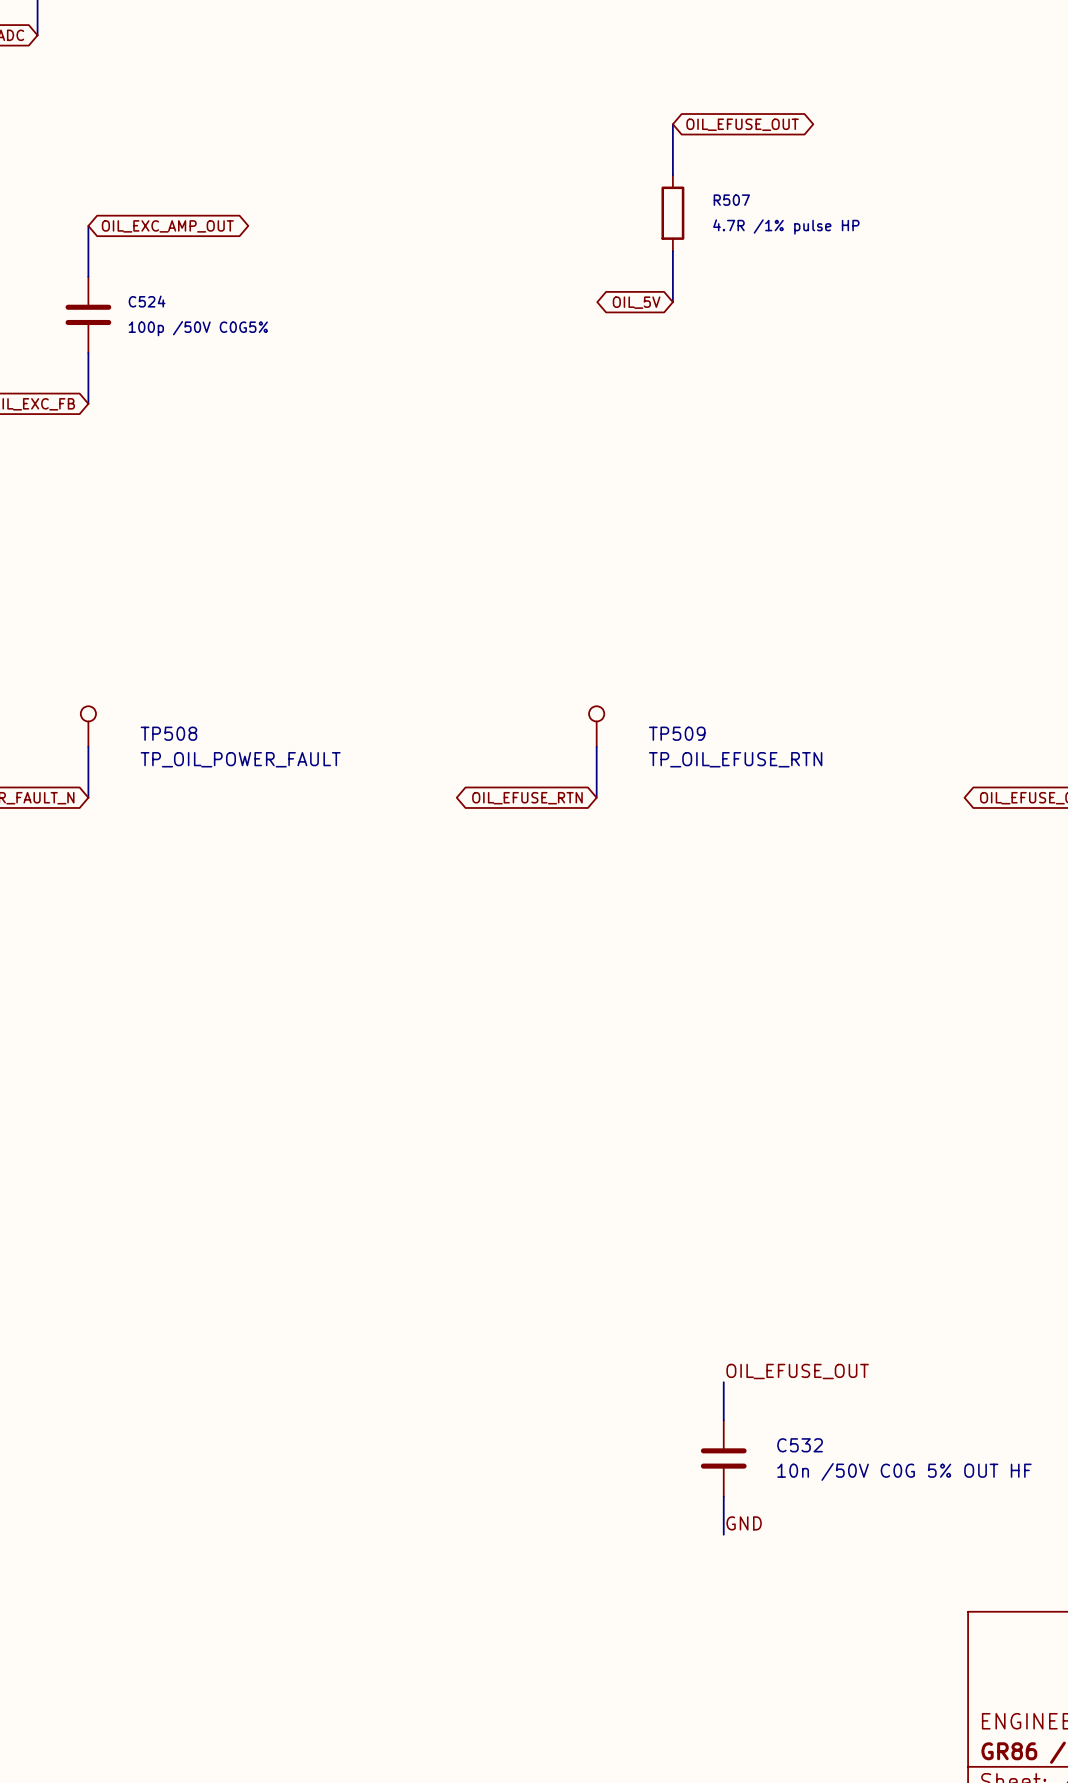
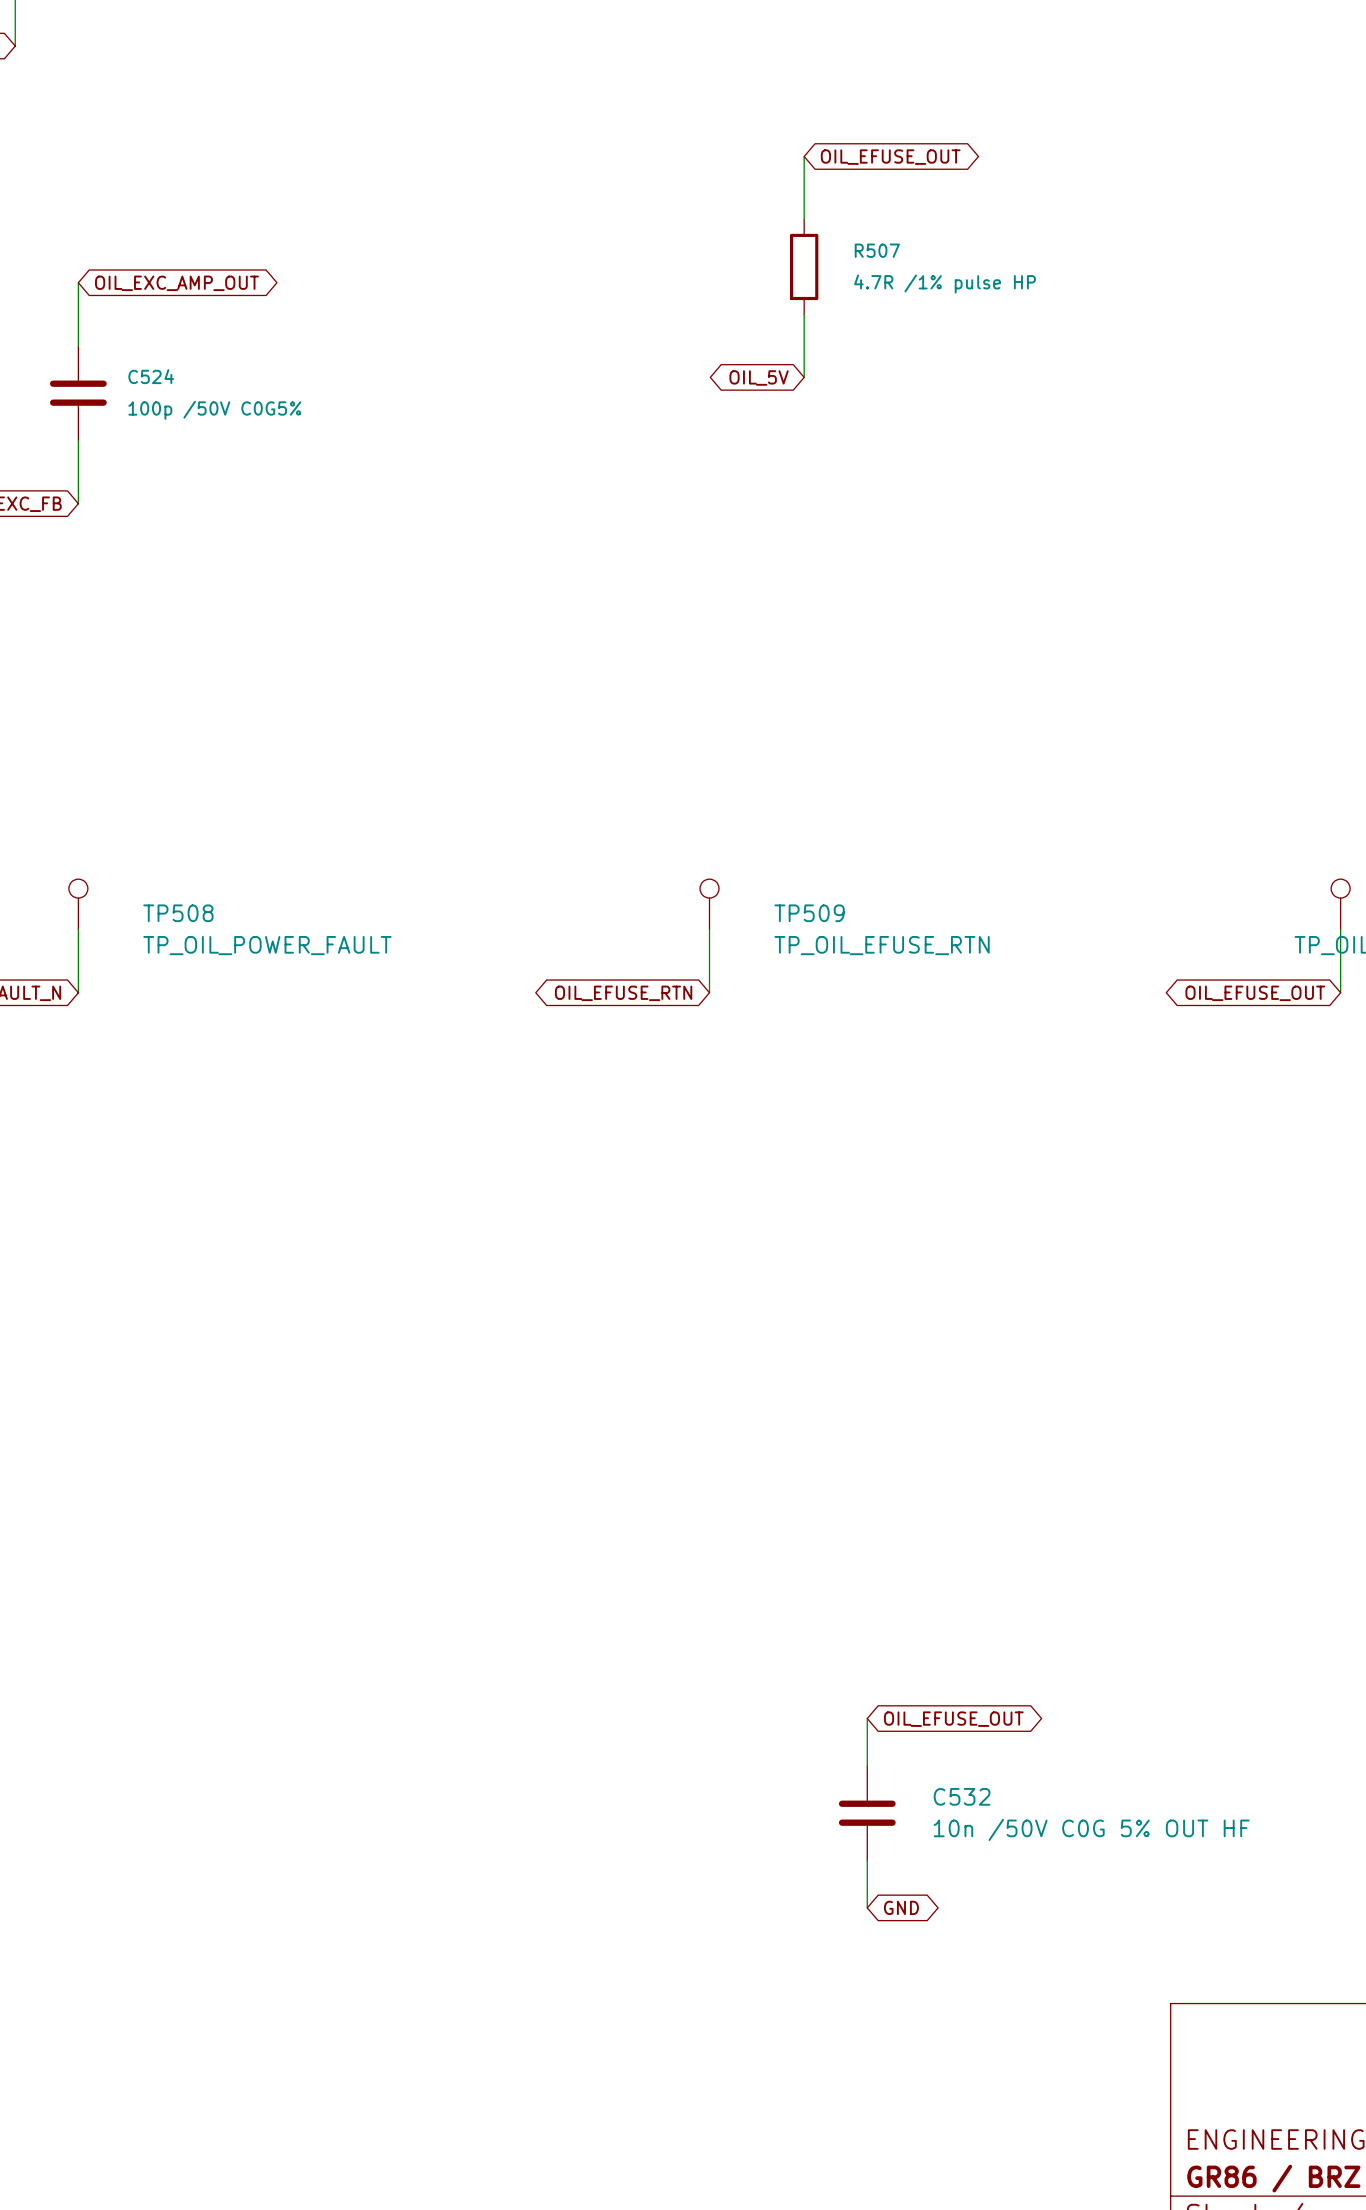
label: OIL_EFUSE_OUT (797, 1371) -> none
global label: none -> OIL_EFUSE_OUT (953, 1719)
label: GND (744, 1523) -> none
global label: none -> GND (901, 1907)

